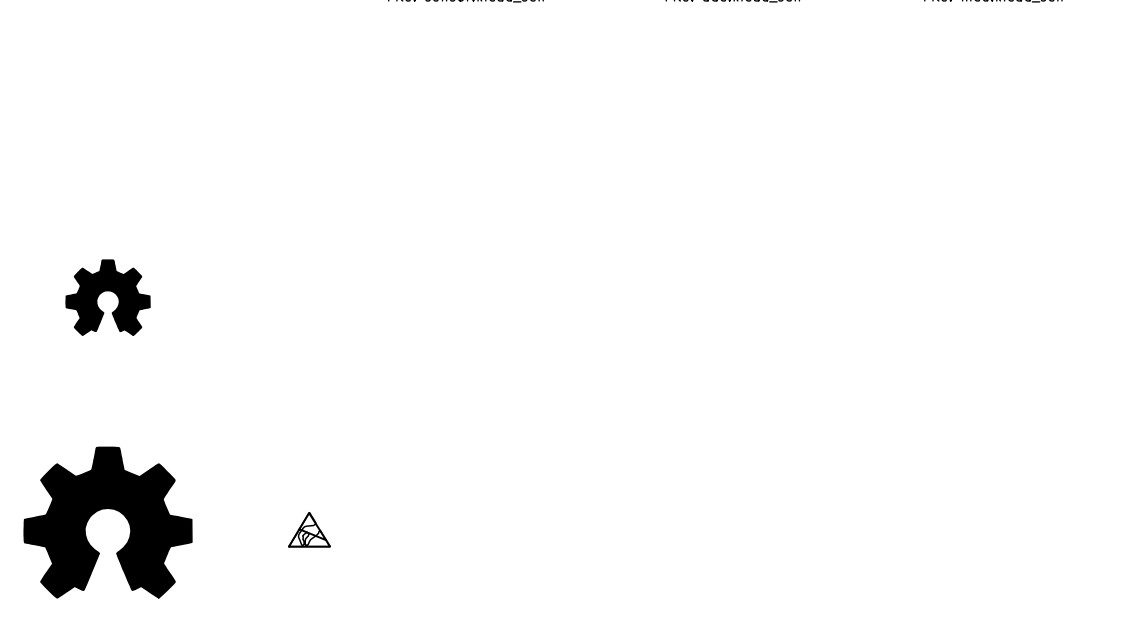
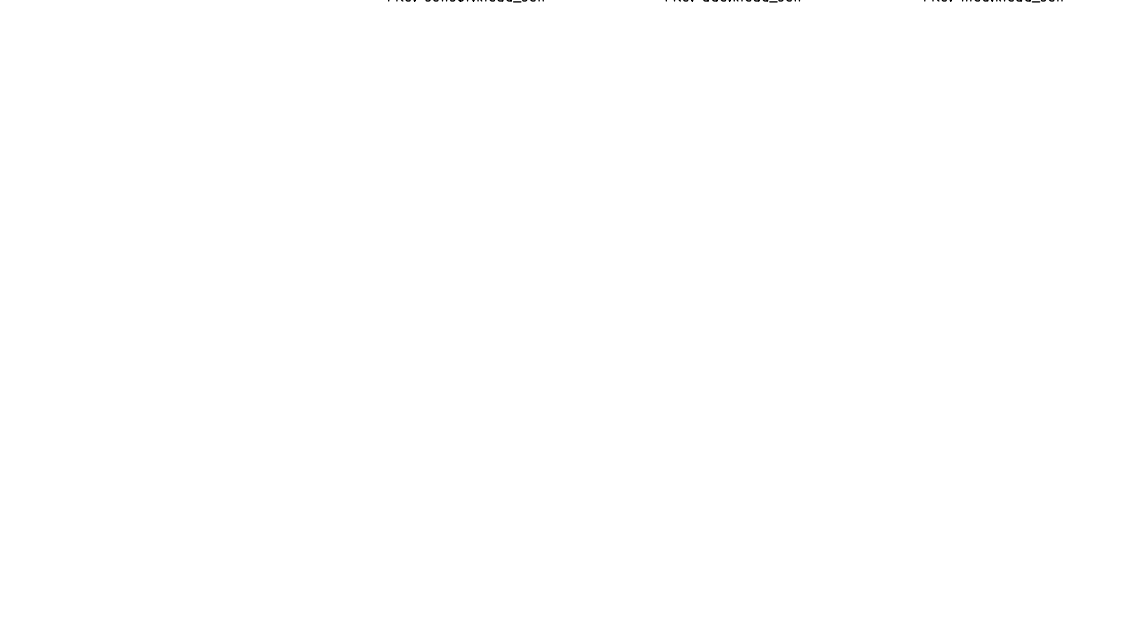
part: (108, 297) -> none
part: (108, 522) -> none
power symbol: (309, 529) -> none

